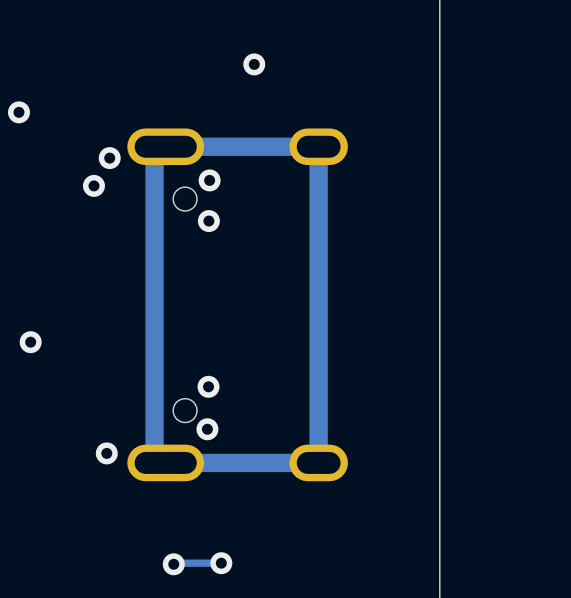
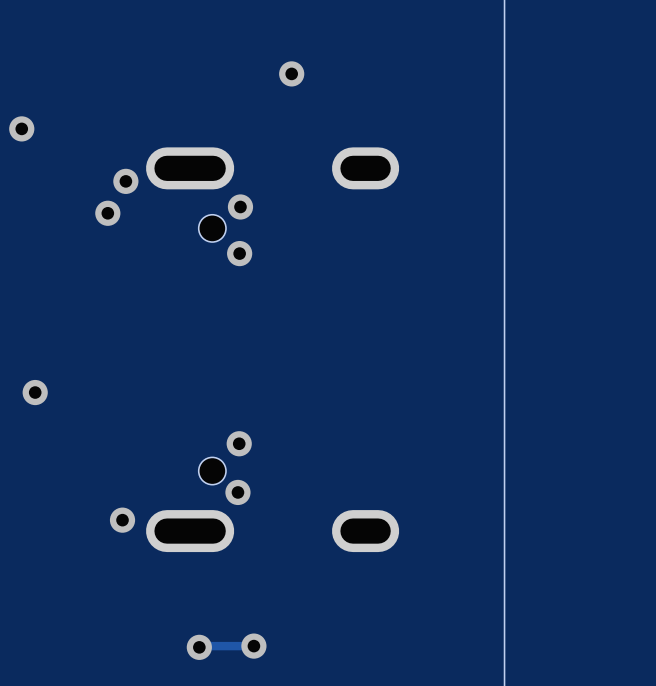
track: (318, 146) (318, 462) (165, 462) (154, 451) (154, 157) (165, 146) (318, 146) -> none

